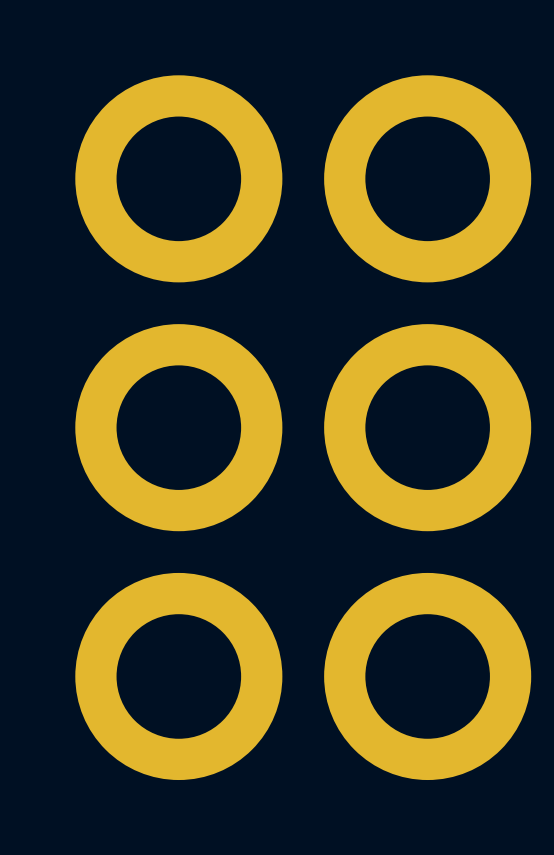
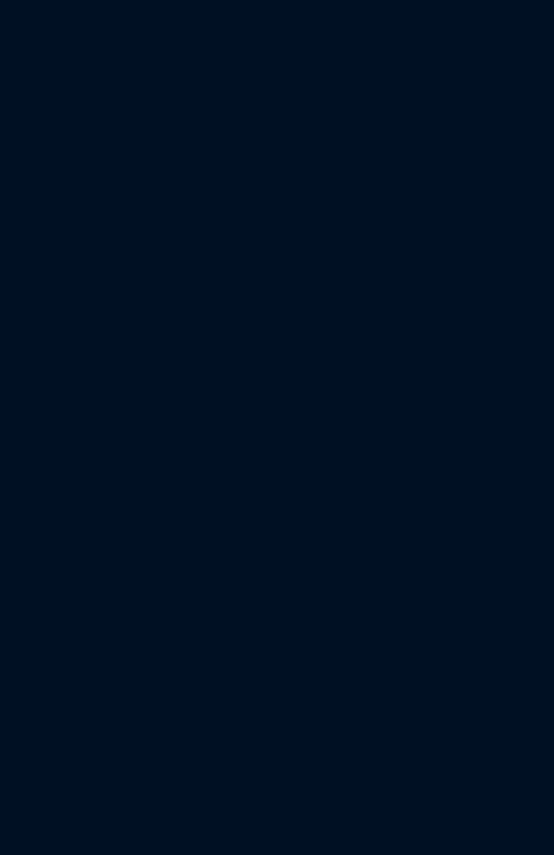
part: (178, 178) -> none
part: (427, 178) -> none
part: (178, 427) -> none
part: (427, 427) -> none
part: (178, 676) -> none
part: (427, 676) -> none

